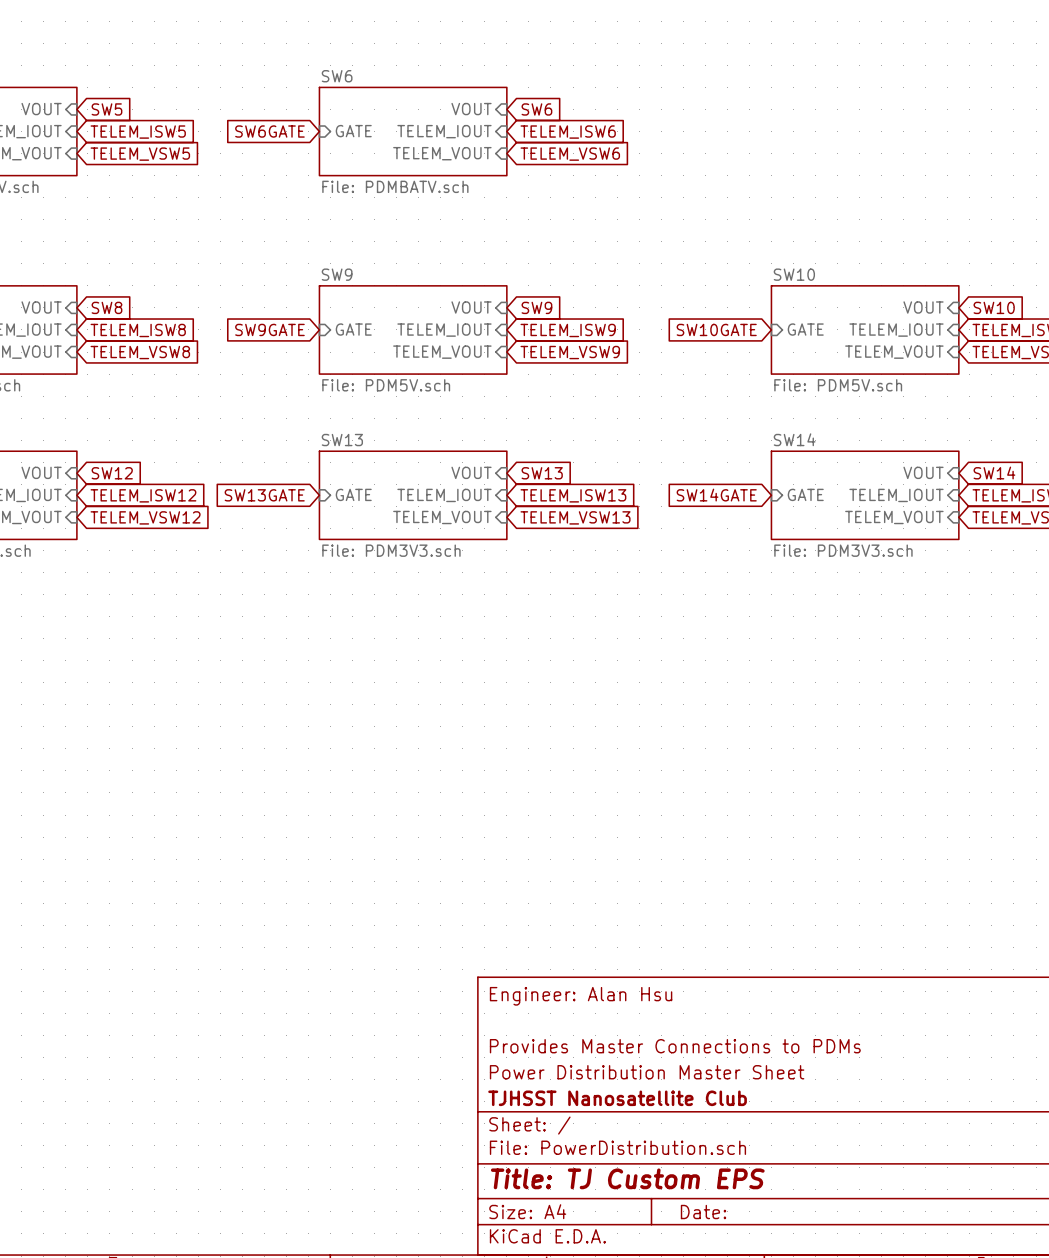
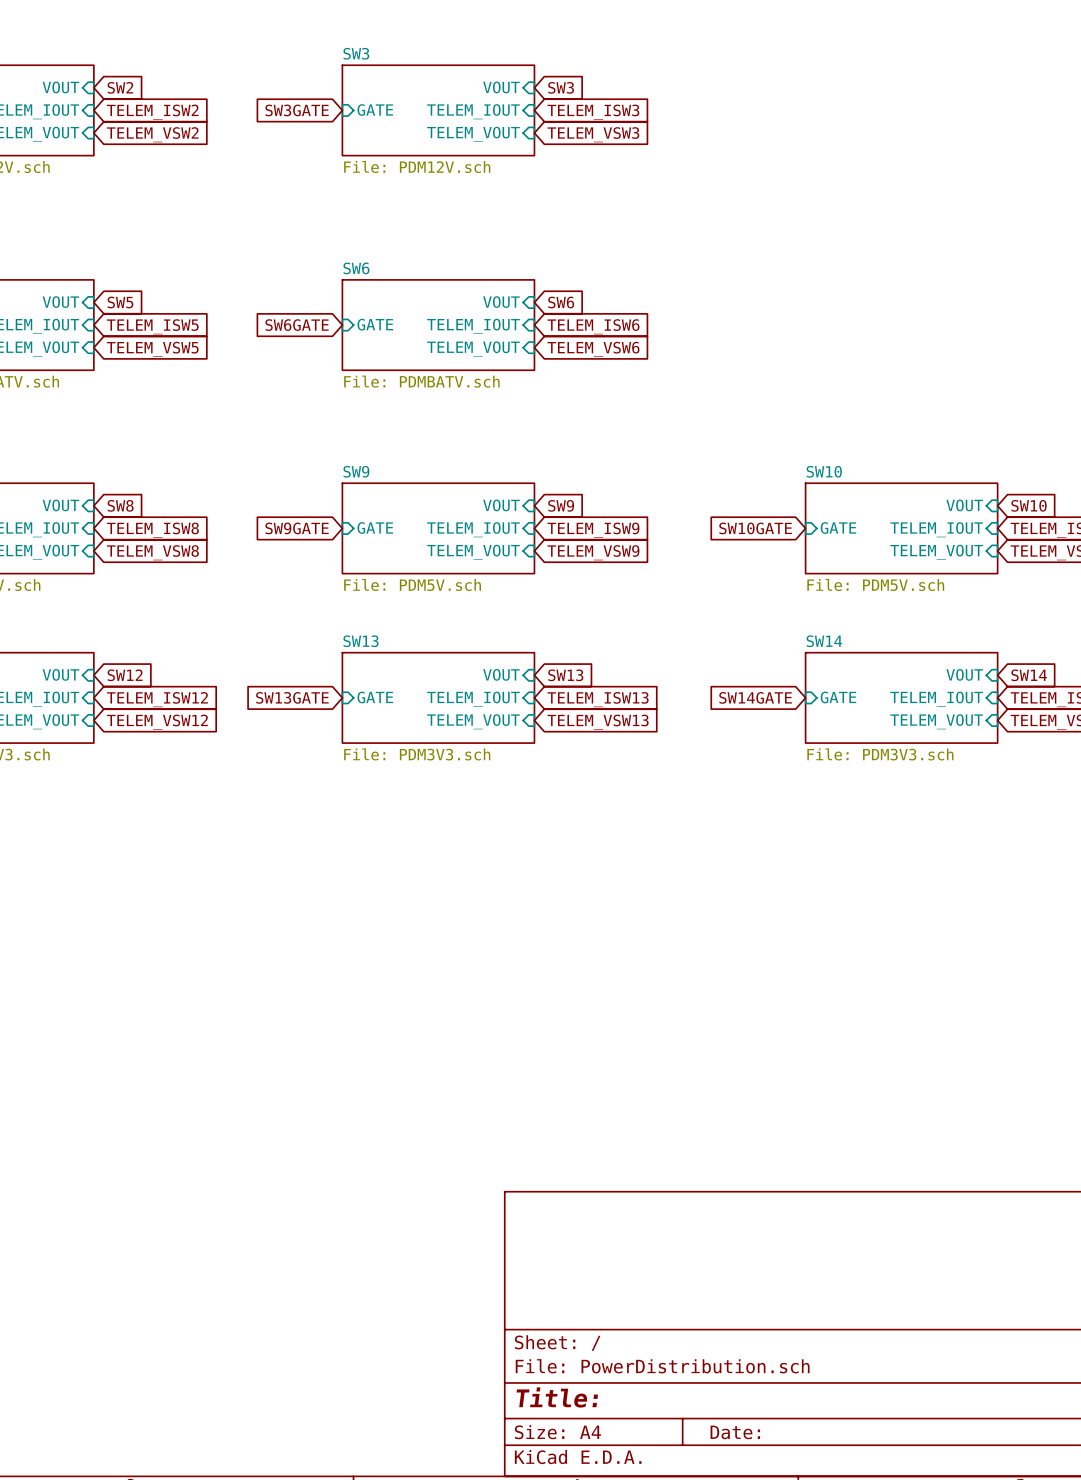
title block: Engineer: Alan Hsu (581, 996) -> none
title block: Provides Master Connections to PDMs (675, 1046) -> none
title block: Power Distribution Master Sheet (647, 1072) -> none
title block: TJHSST Nanosatellite Club (617, 1098) -> none
title block: Title: TJ Custom EPS (627, 1178) -> Title: (557, 1397)

